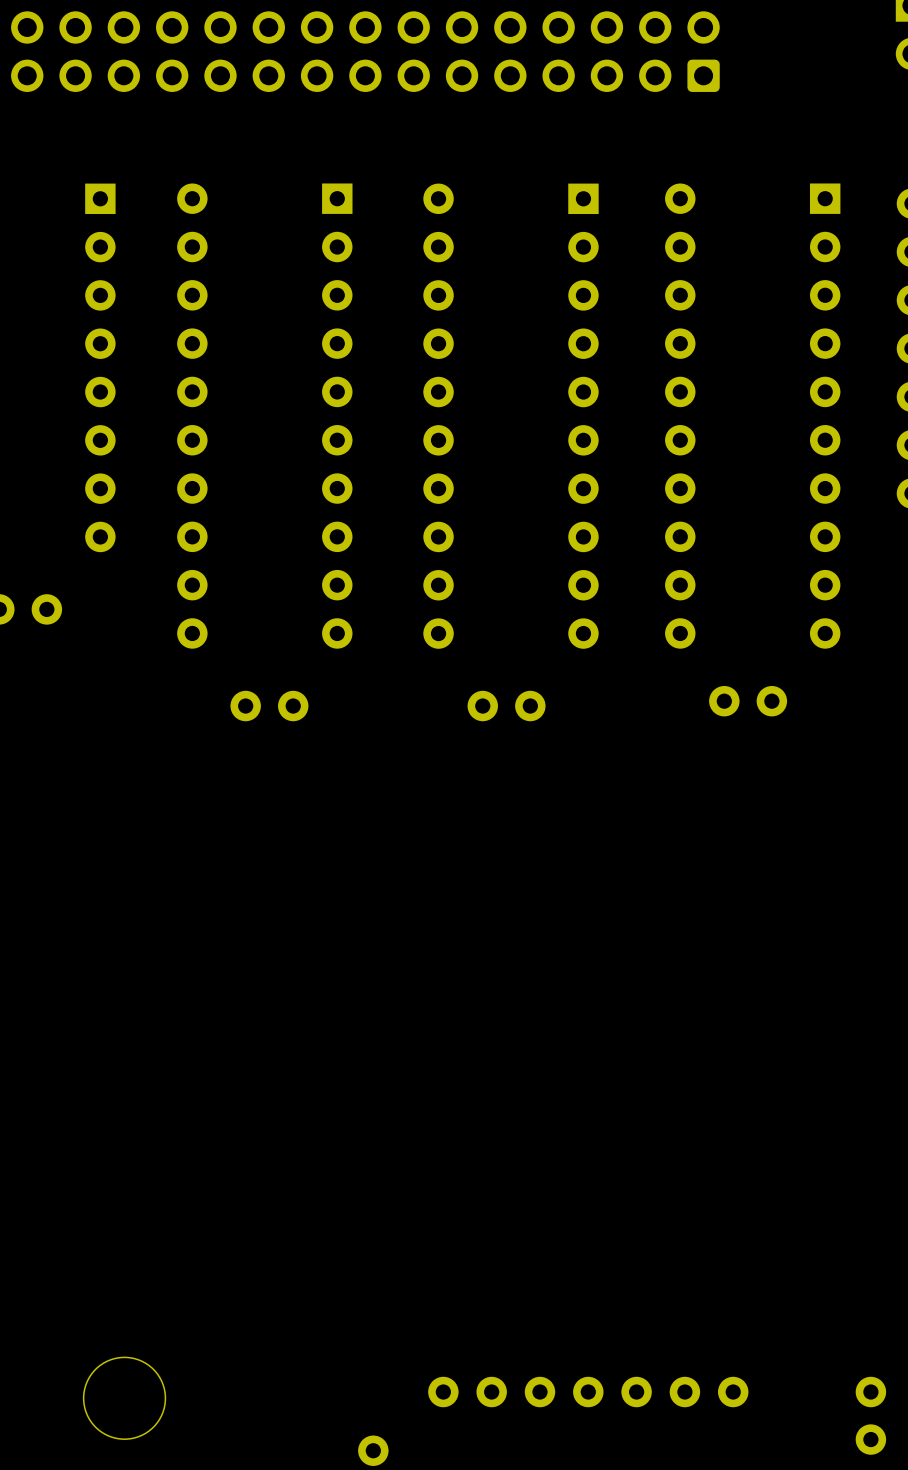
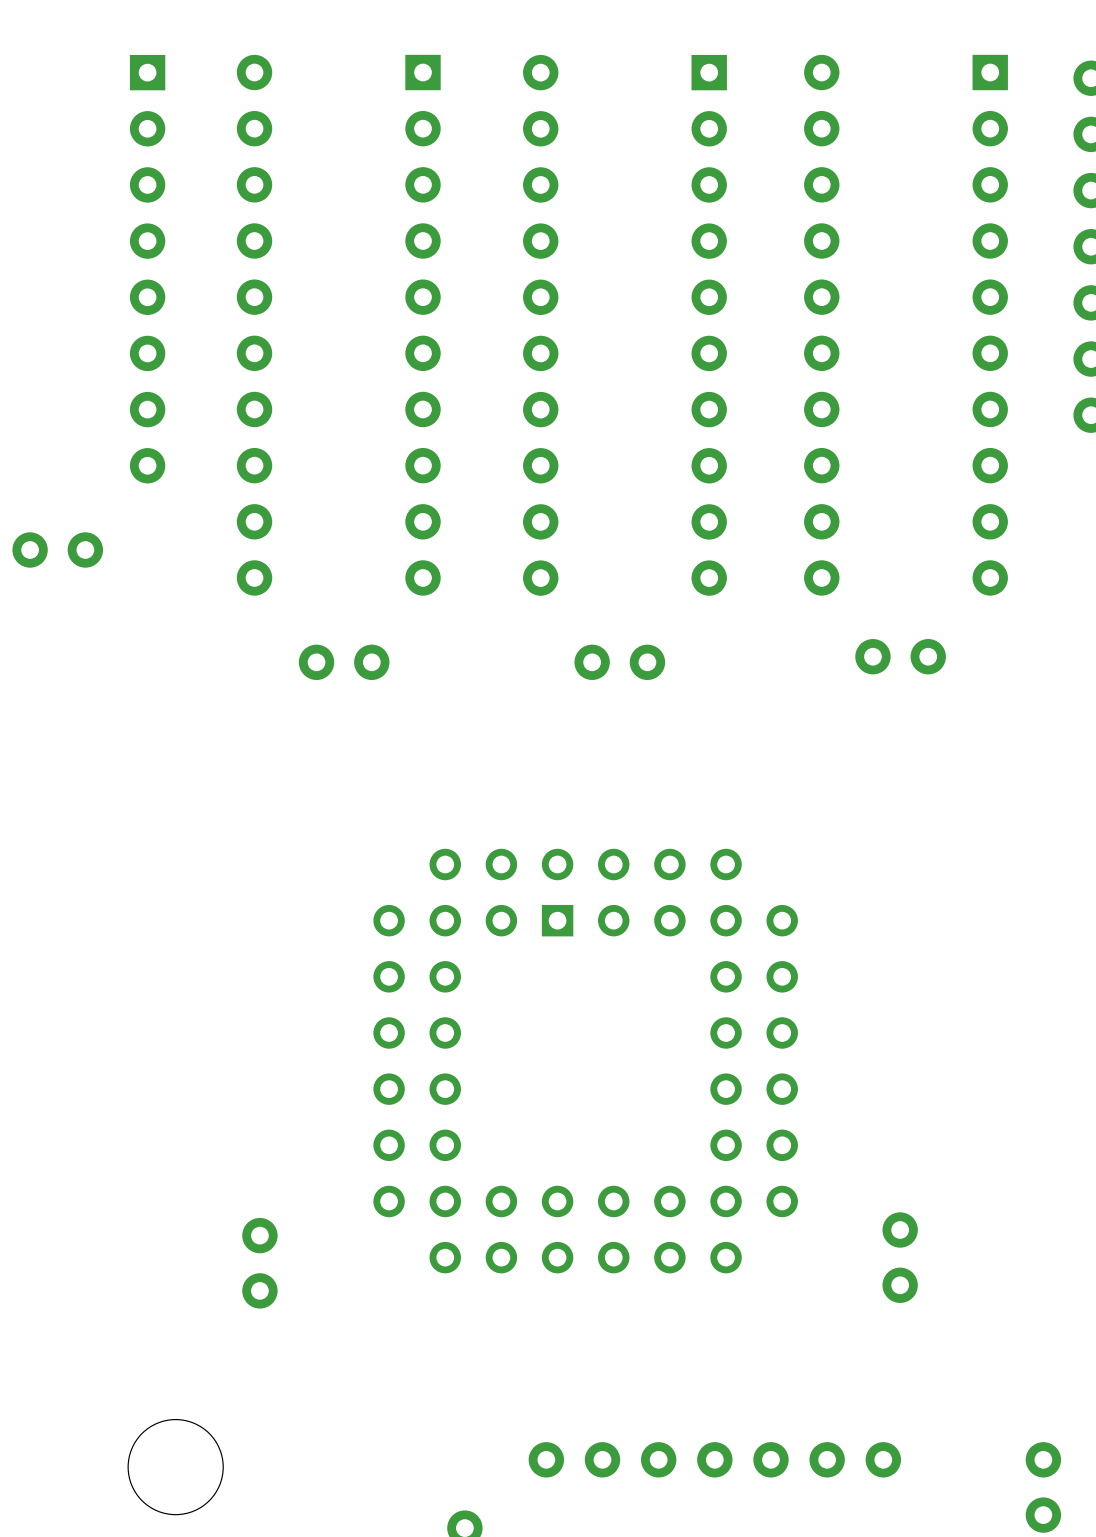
part: none -> (585, 1061)
part: none -> (900, 1257)
part: none -> (259, 1263)

